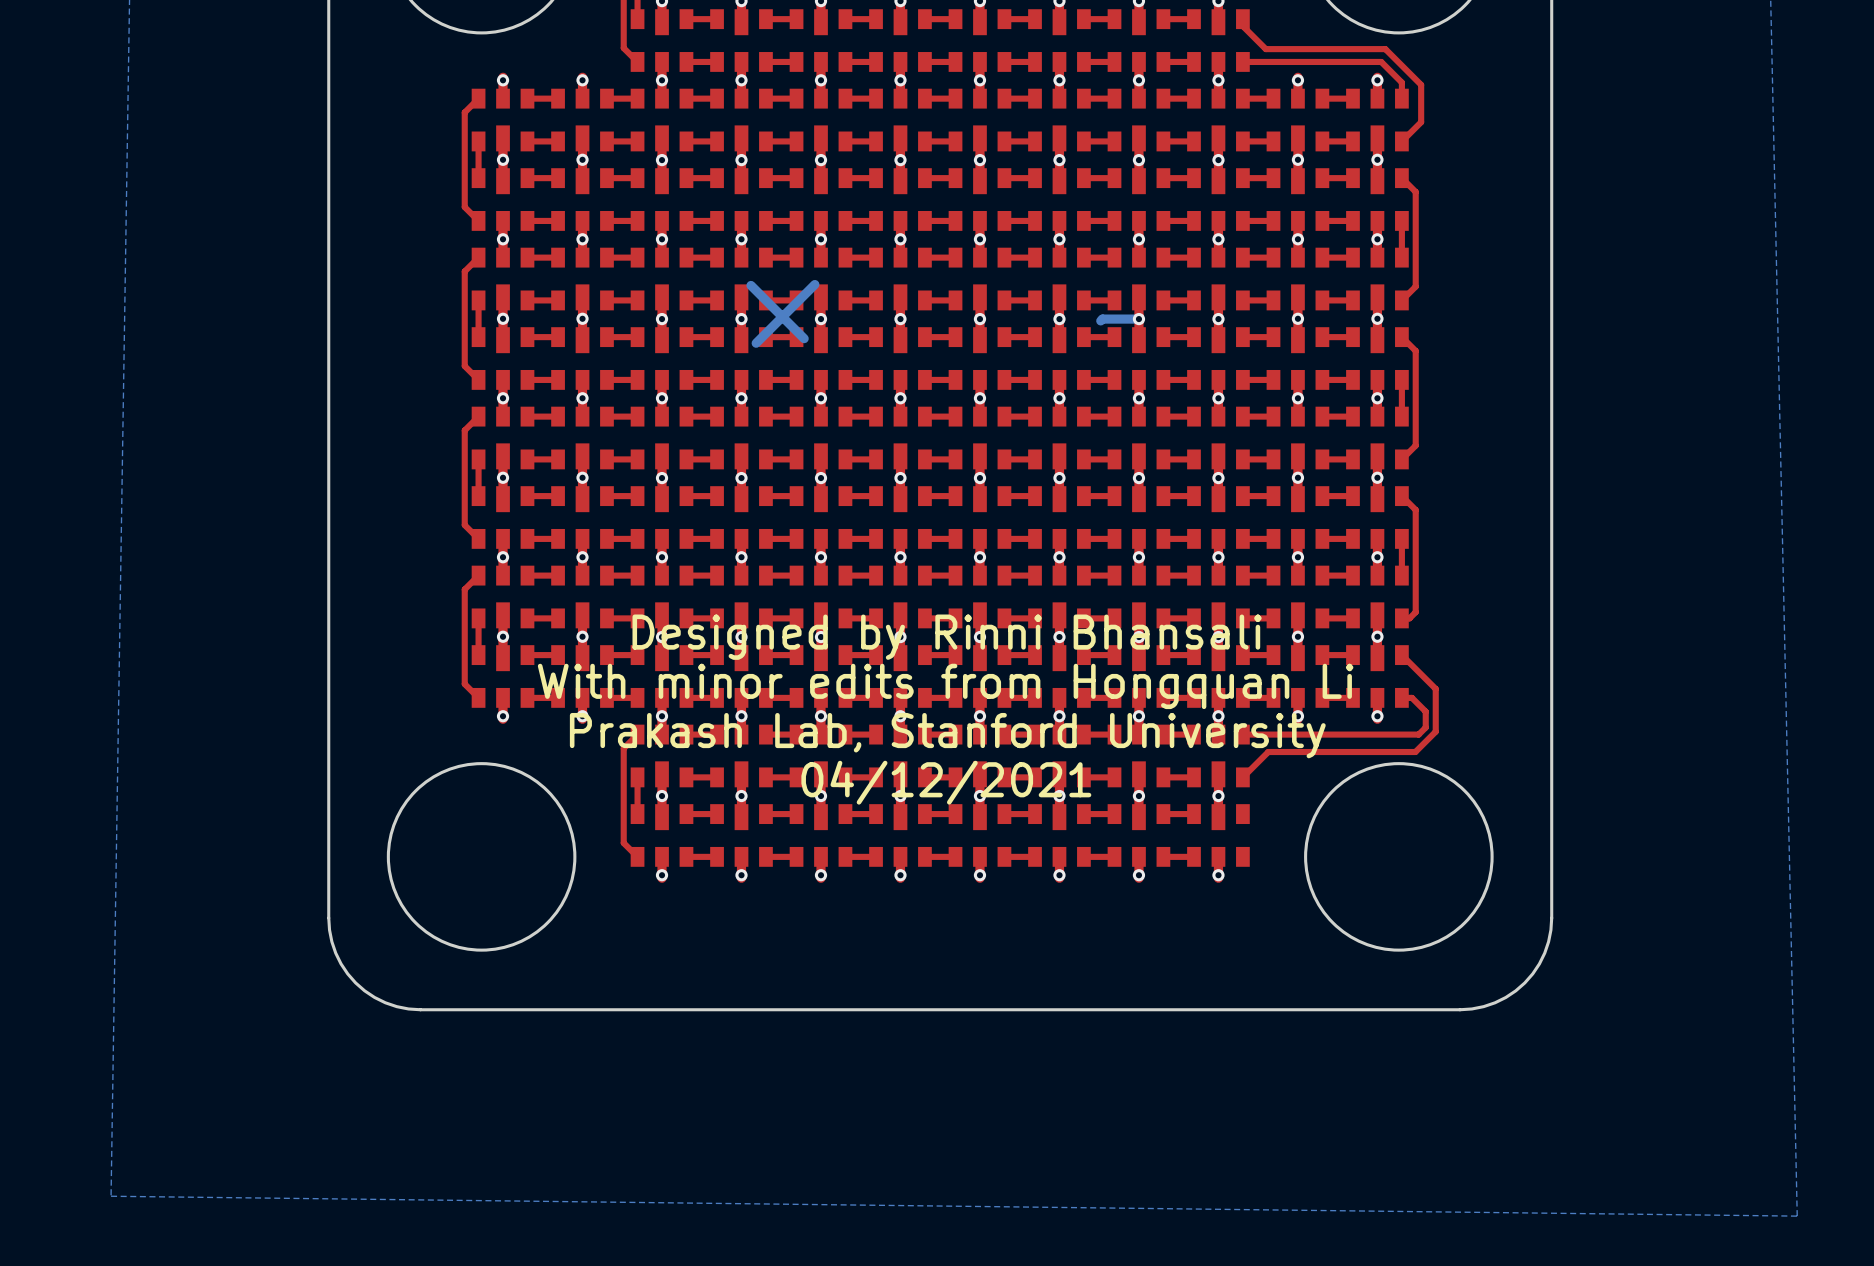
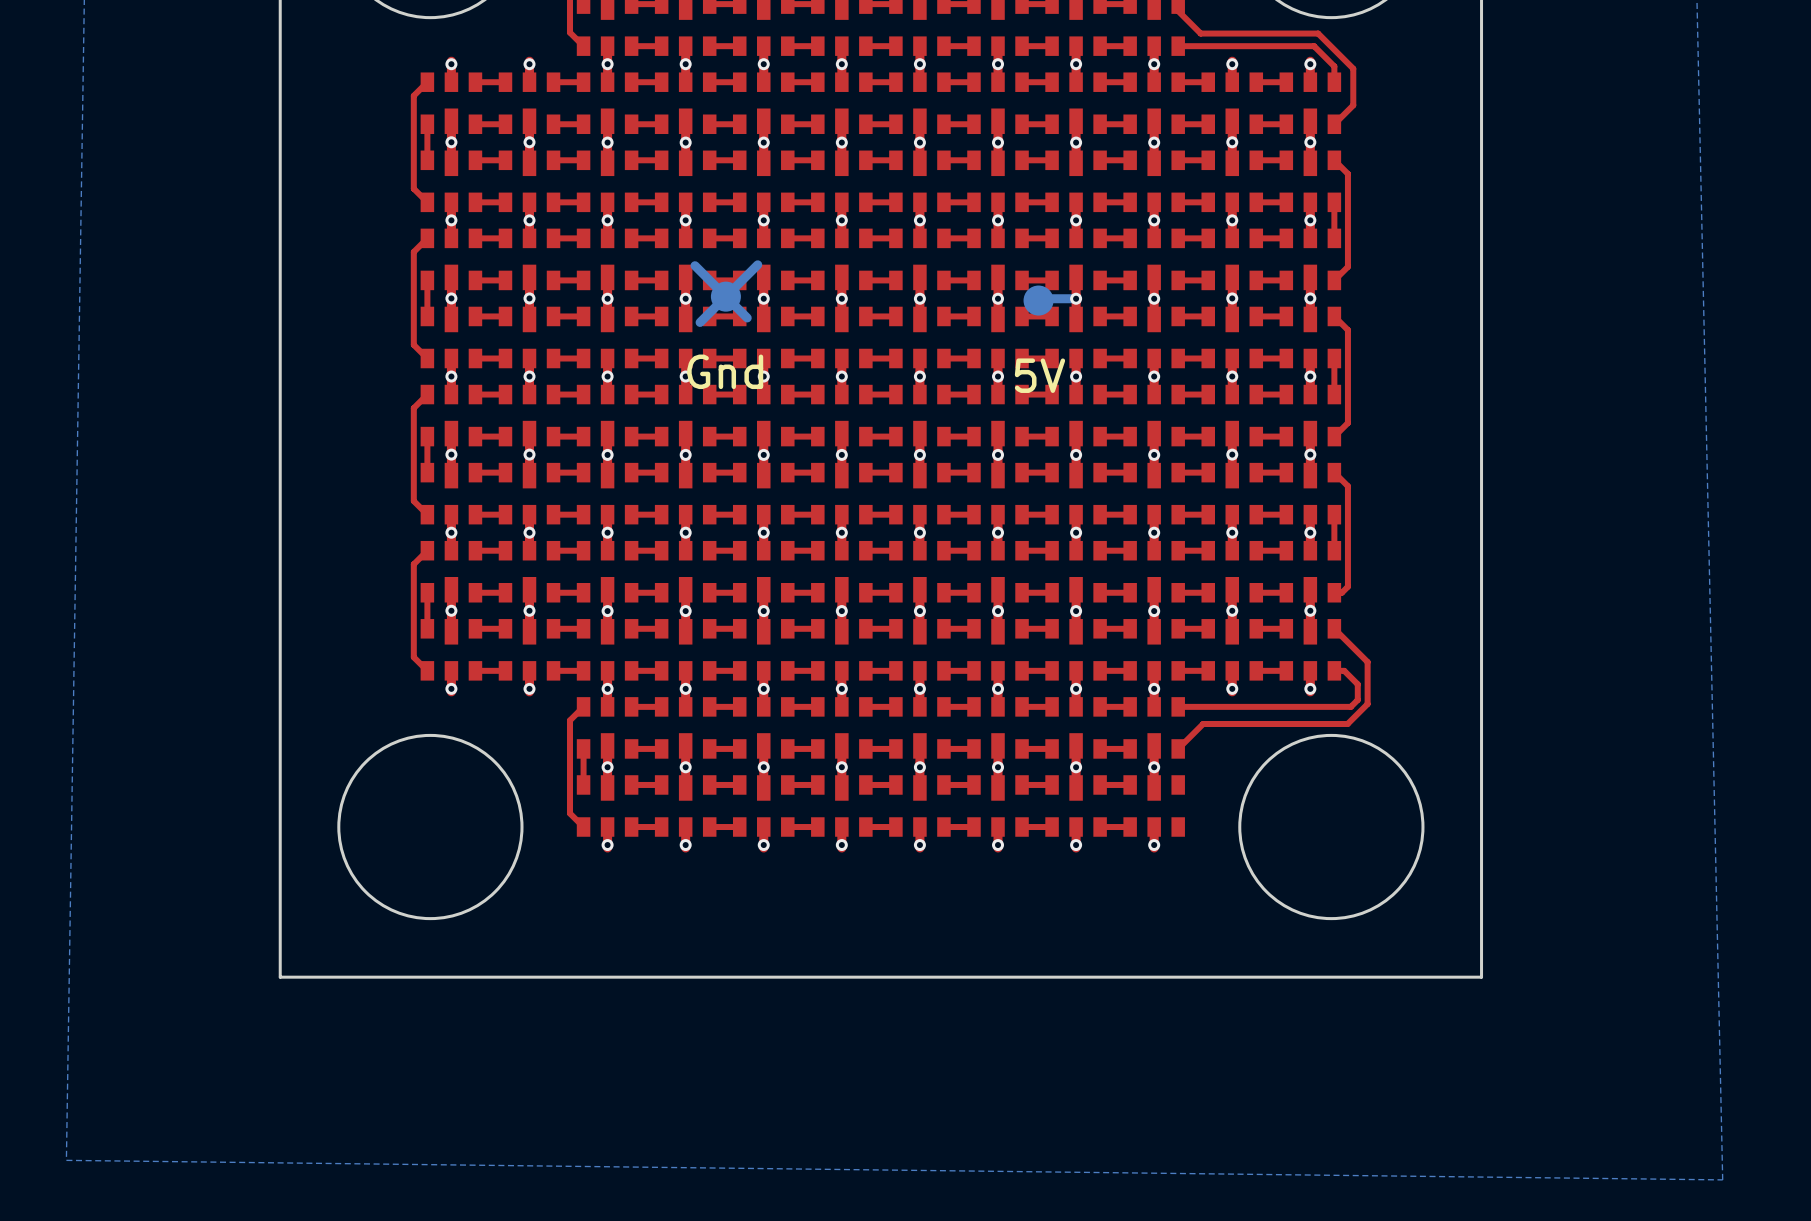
Gnd: none -> (725, 296)
5V: none -> (1038, 300)
text: Designed by Rinni Bhansali (947, 637) -> none
text: With minor edits from Hongquan Li (945, 686) -> none
text: Prakash Lab, Stanford University (947, 735) -> none
text: 04/12/2021 (946, 782) -> none
board edge: (328, 918) (329, 930) (335, 953) (341, 963) (355, 982) (374, 997) (385, 1002) (408, 1008) (420, 1009) -> (280, 887) (280, 977) (370, 977)
board edge: (1551, 918) (1548, 941) (1544, 953) (1539, 963) (1524, 982) (1505, 997) (1495, 1002) (1471, 1008) (1459, 1009) -> (1481, 887) (1481, 977) (1391, 977)

